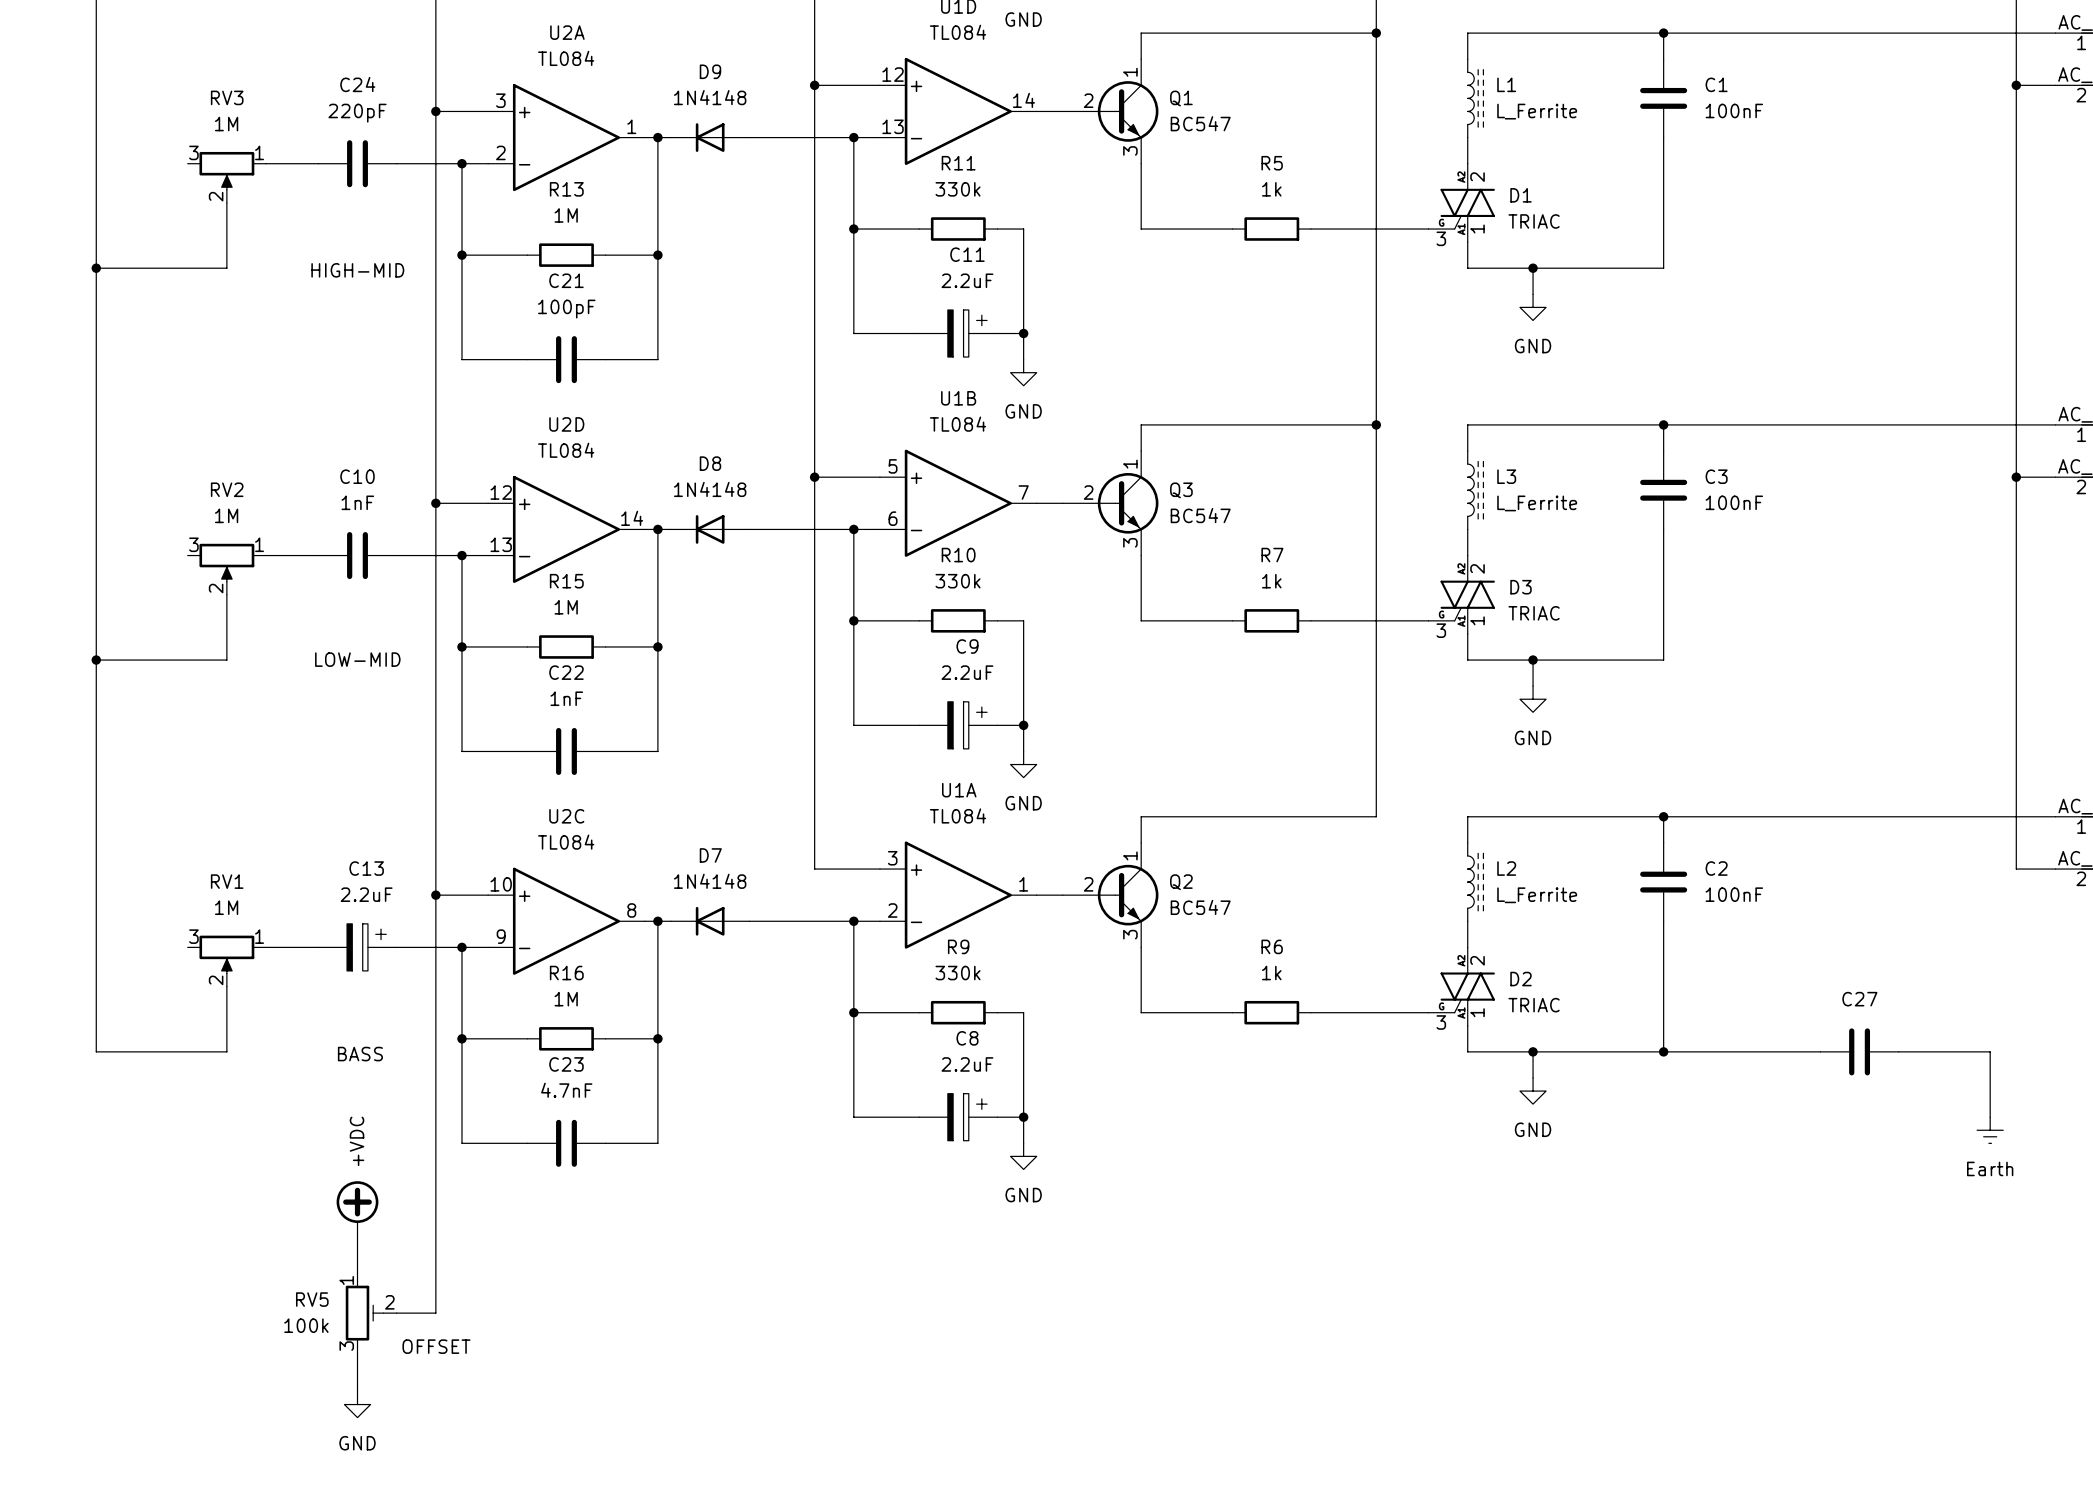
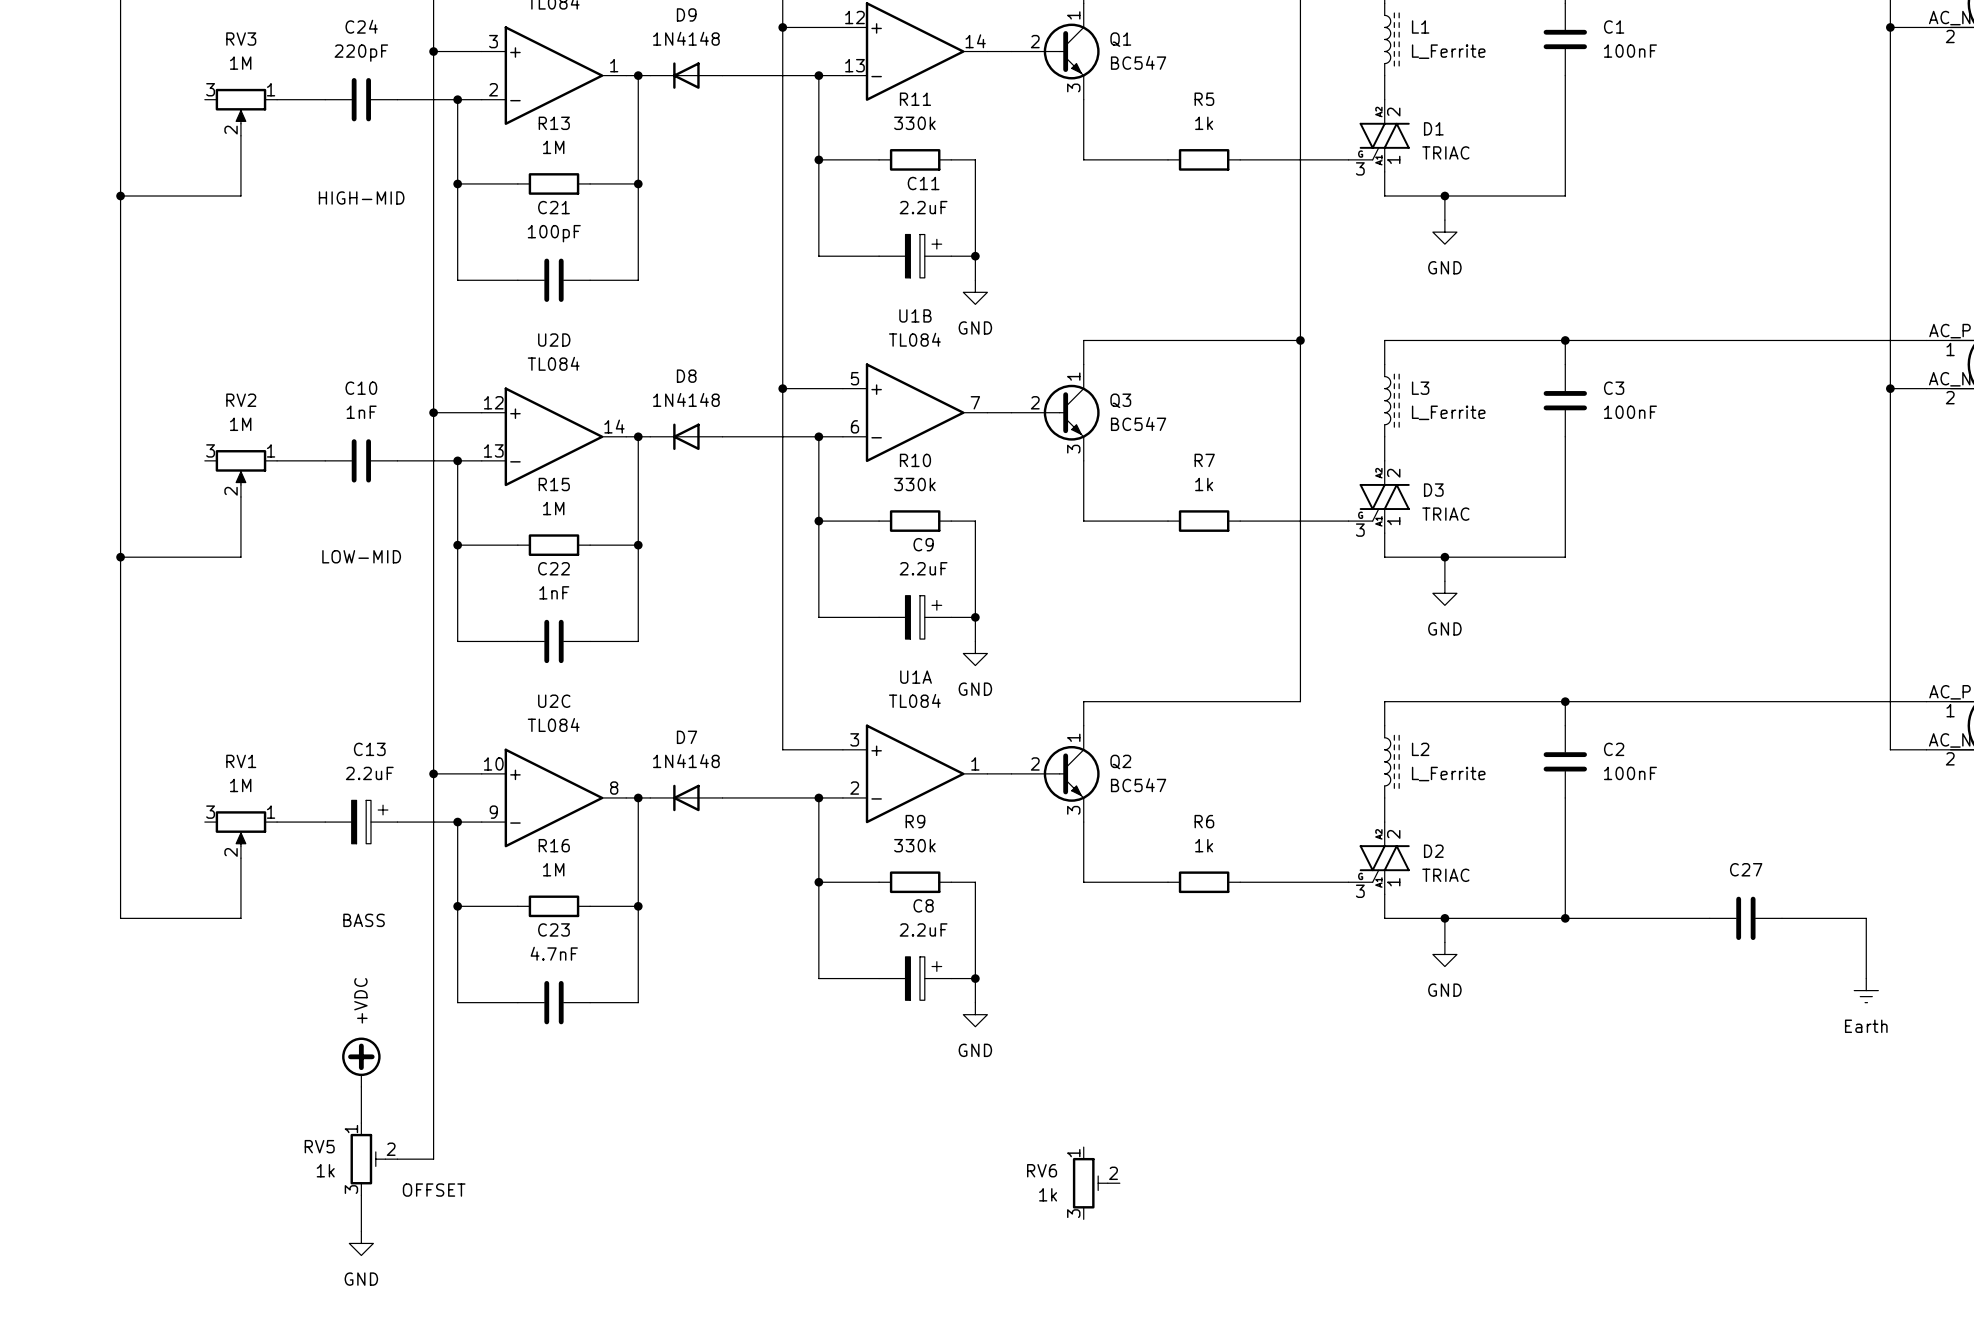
RV5 value: 100k (306, 1325) -> 1k (325, 1170)
RV6: none -> 1k (1096, 1183)

